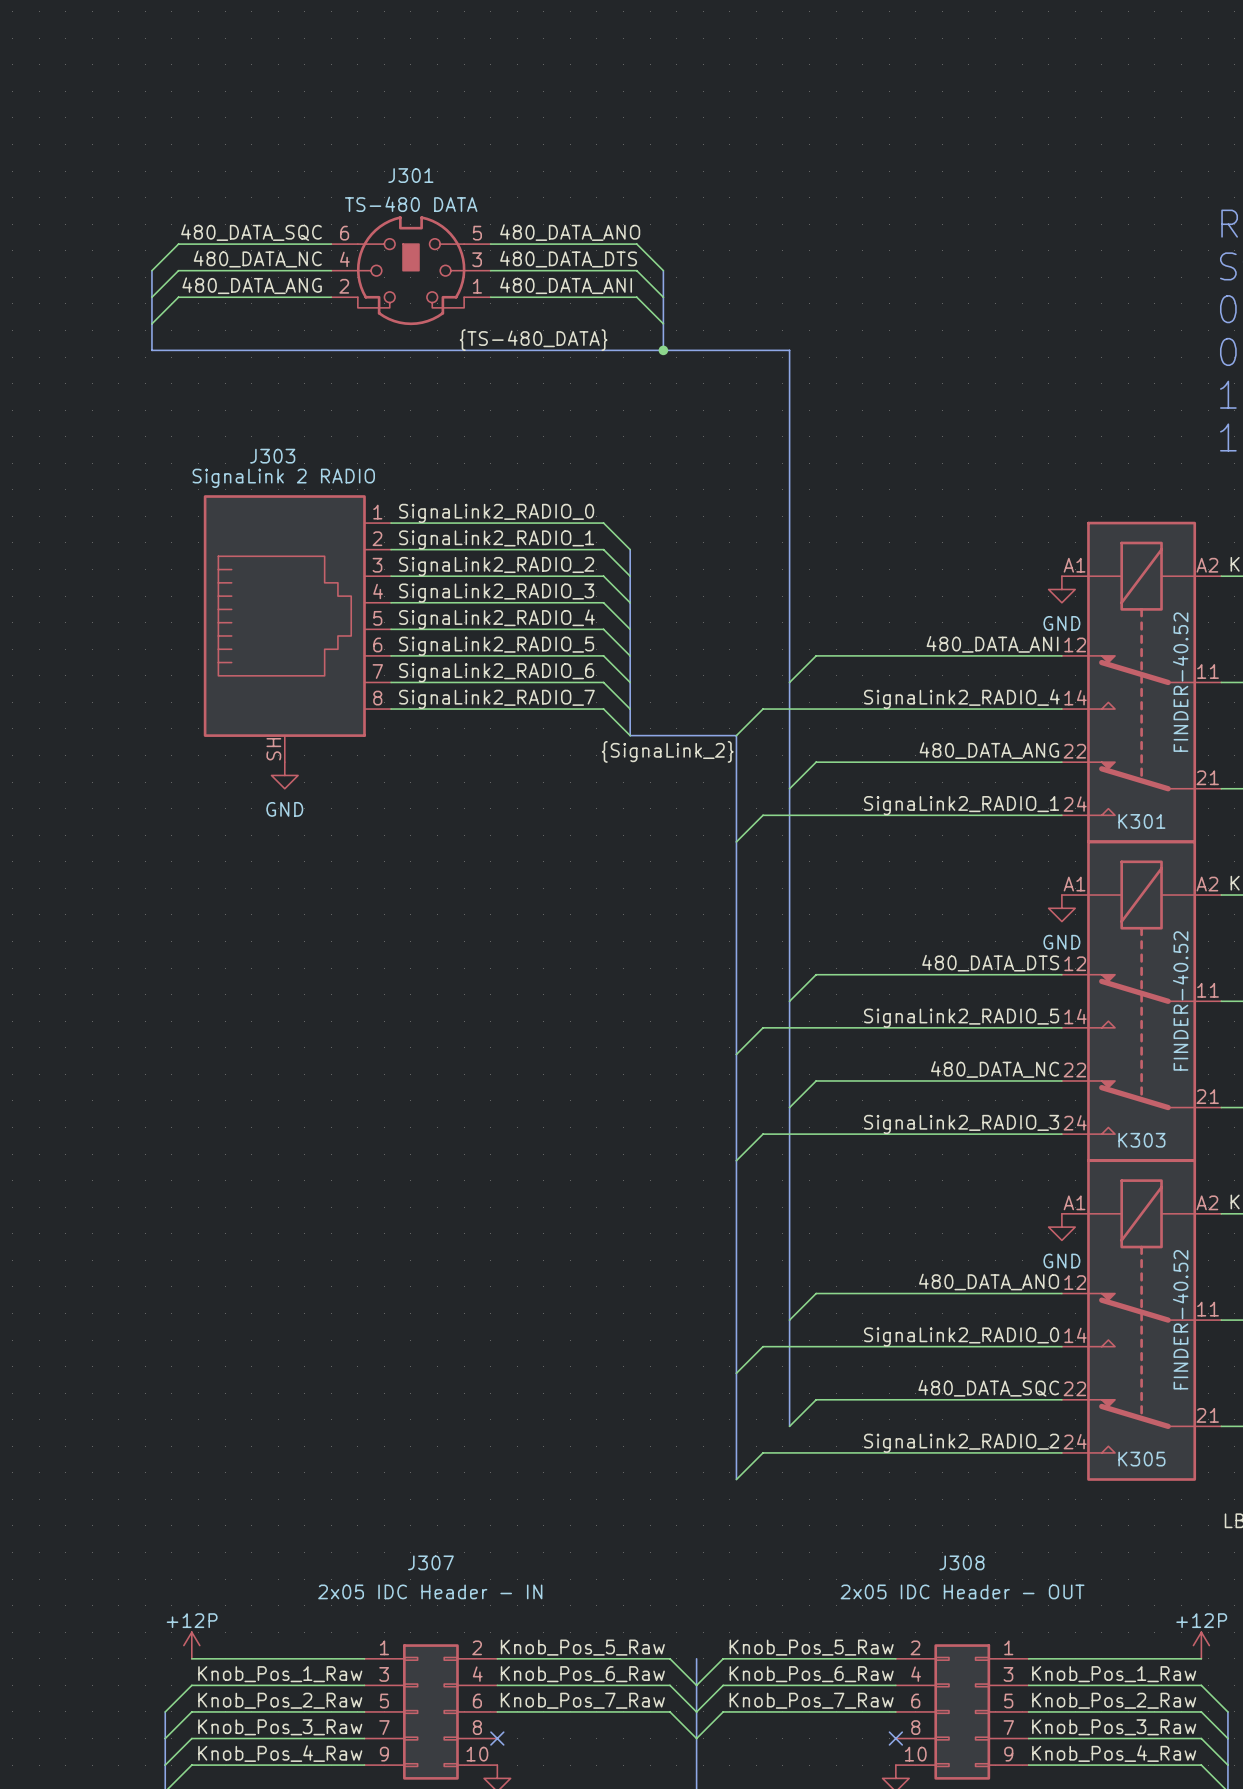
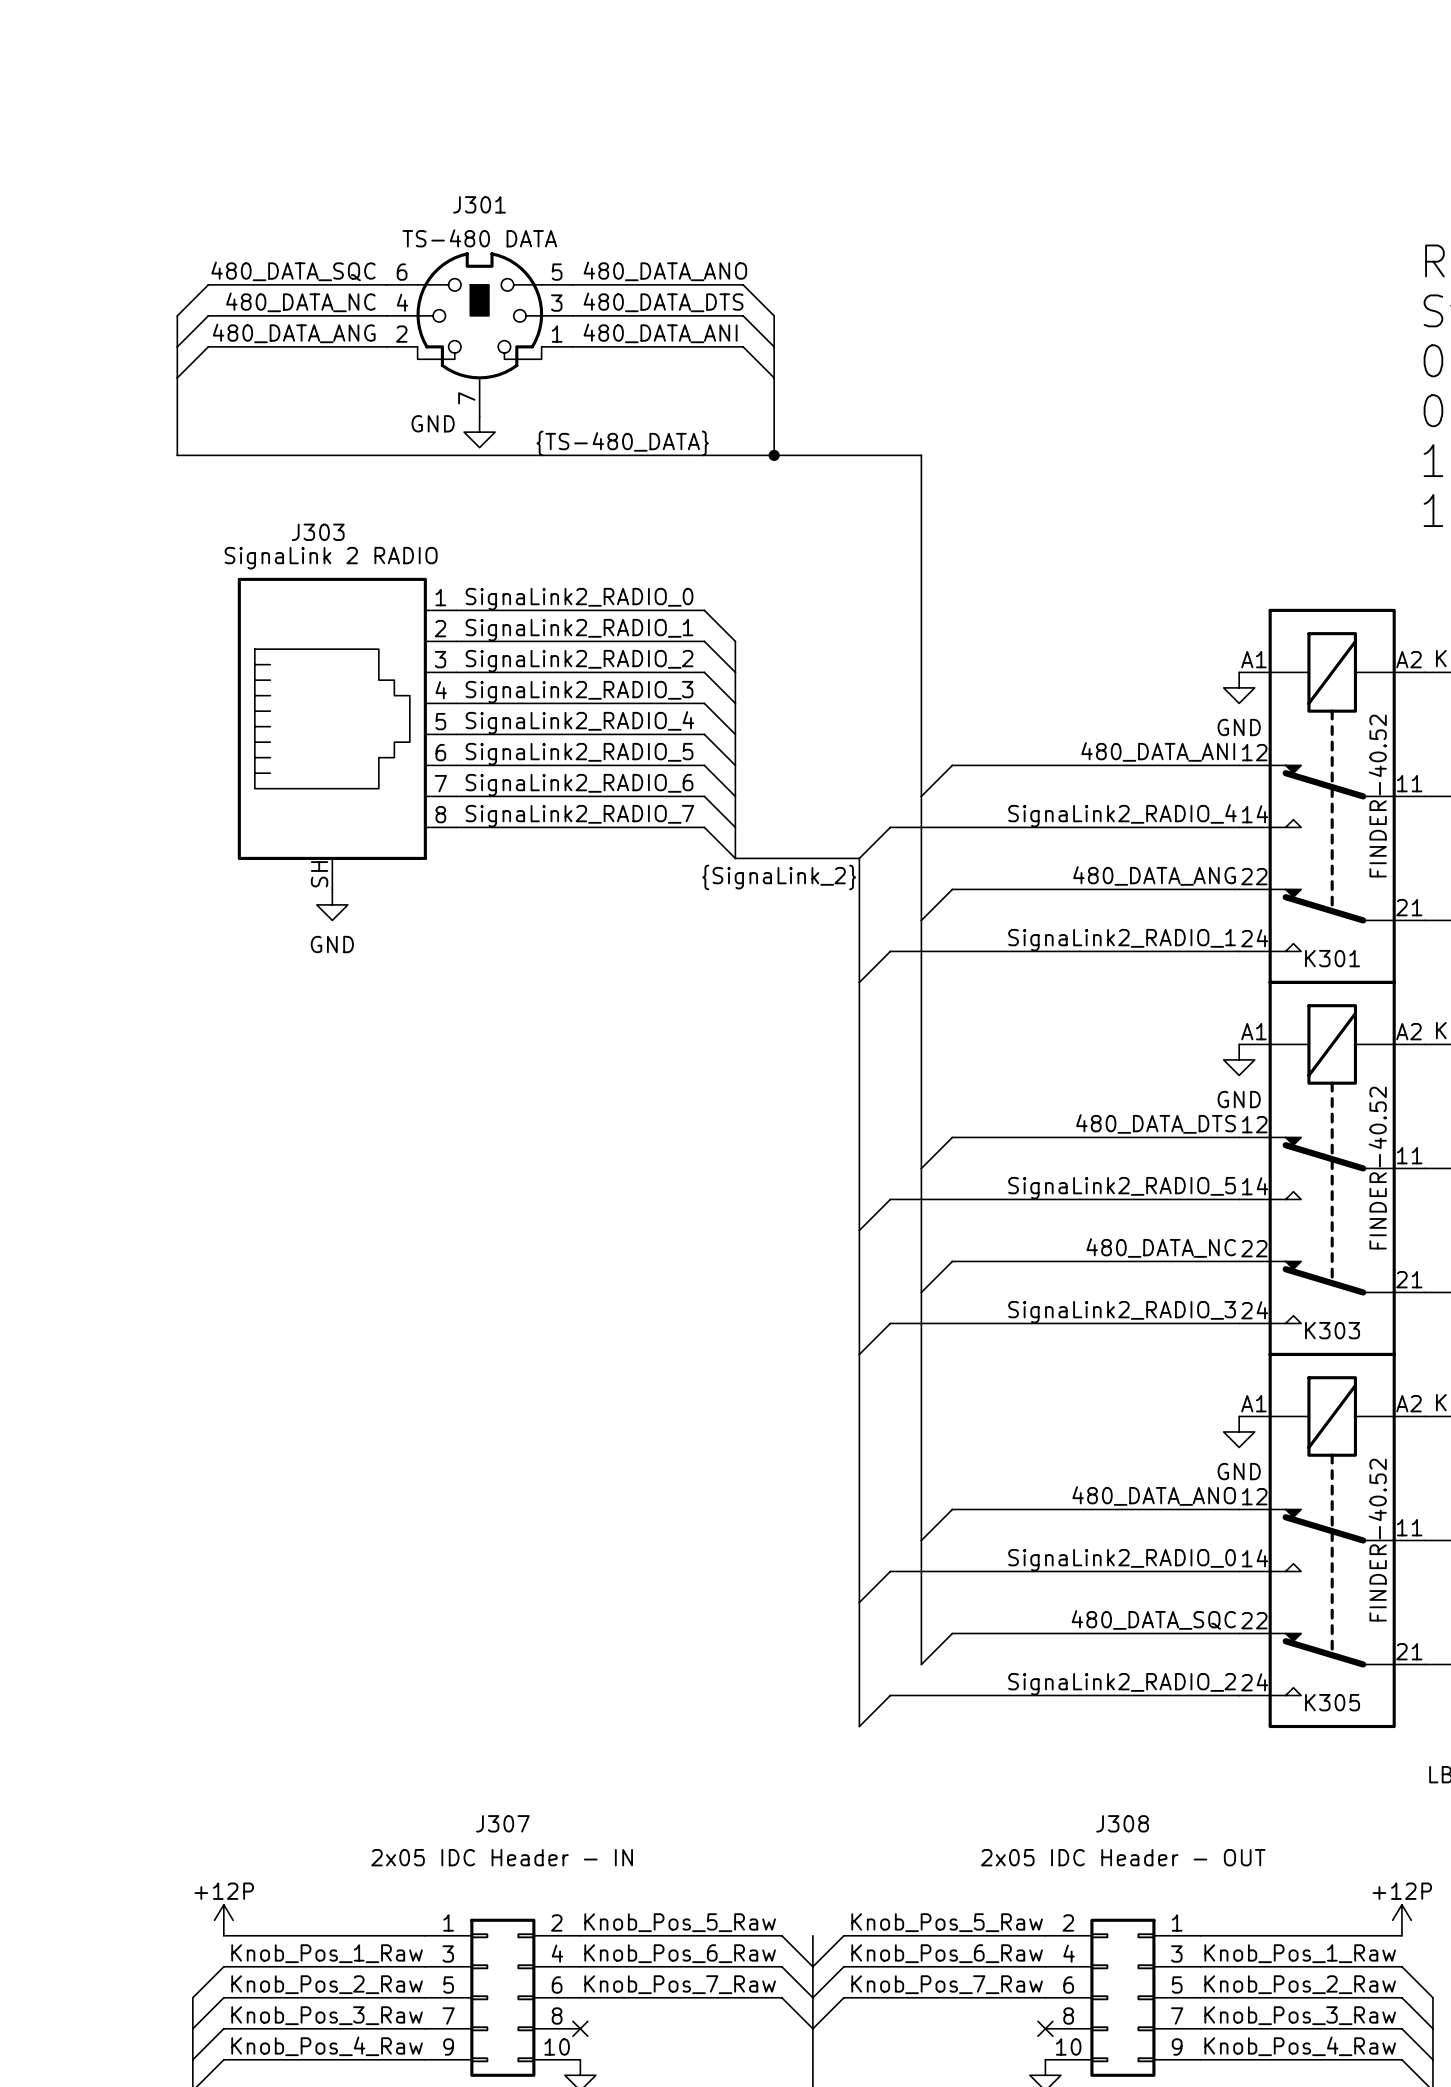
J301 symbol: [331, 216, 491, 326] -> [386, 252, 573, 417]
label position: {TS-480_DATA} (533, 340) -> {TS-480_DATA} (622, 443)
bus: (151, 350) (789, 350) (789, 390) -> (177, 408) (177, 455) (921, 455)
bus: none -> (774, 408) (774, 455)
junction position: (663, 350) -> (774, 455)
power symbol: none -> GND (479, 432)

